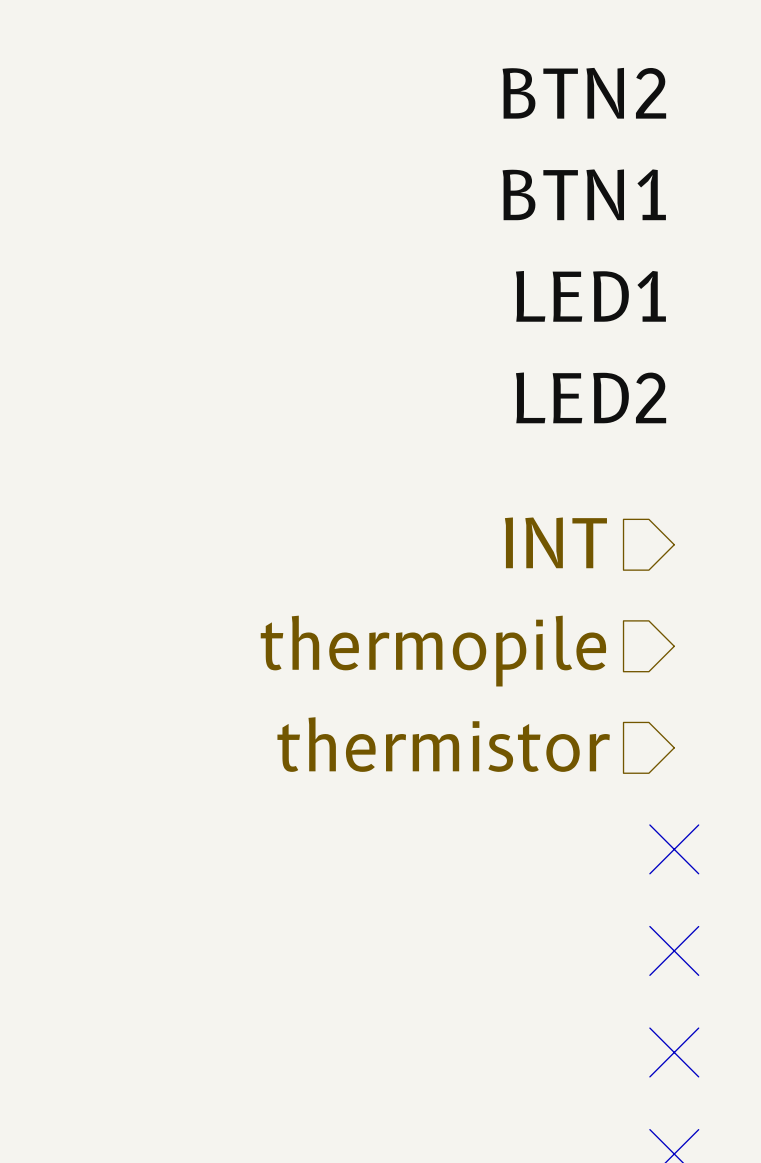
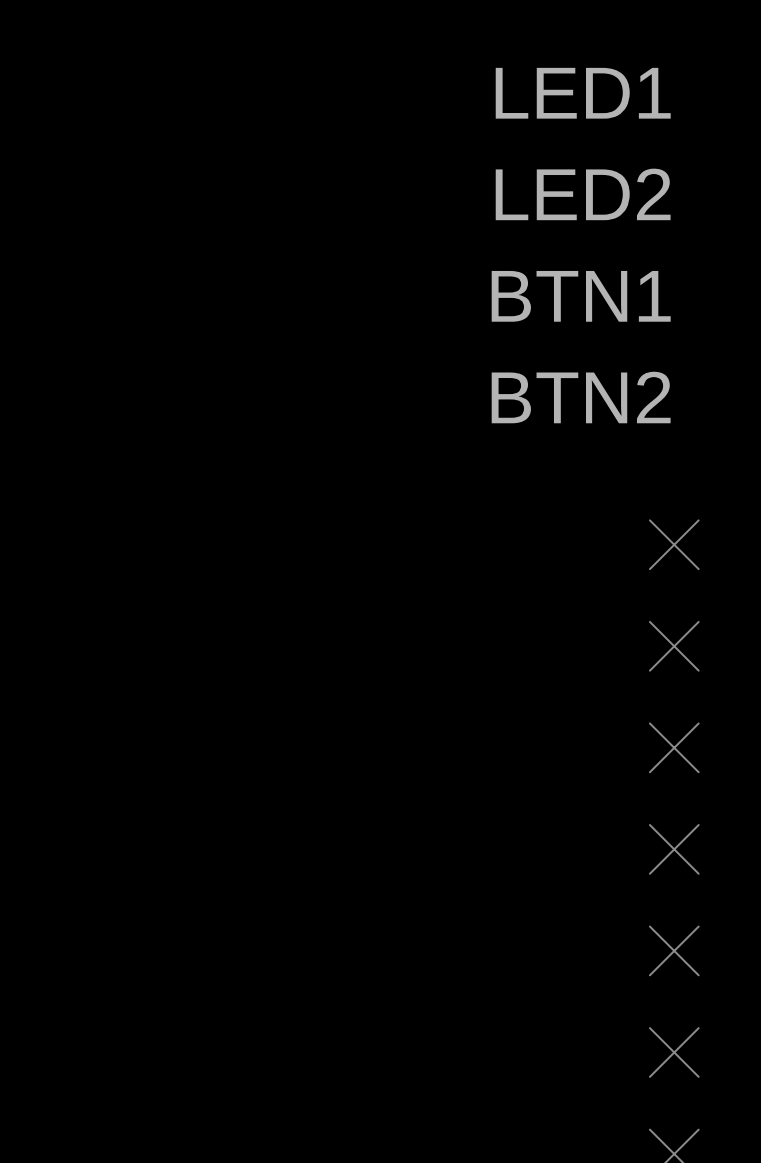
label: BTN2 (584, 93) -> LED1 (583, 93)
label: BTN1 (584, 194) -> LED2 (583, 194)
label: LED1 (590, 296) -> BTN1 (581, 296)
label: LED2 (591, 397) -> BTN2 (581, 397)
hierarchical label: INT (555, 542) -> none
no-connect mark: none -> (674, 544)
no-connect mark: none -> (674, 646)
hierarchical label: thermopile (433, 651) -> none
hierarchical label: thermistor (443, 744) -> none
no-connect mark: none -> (674, 747)

